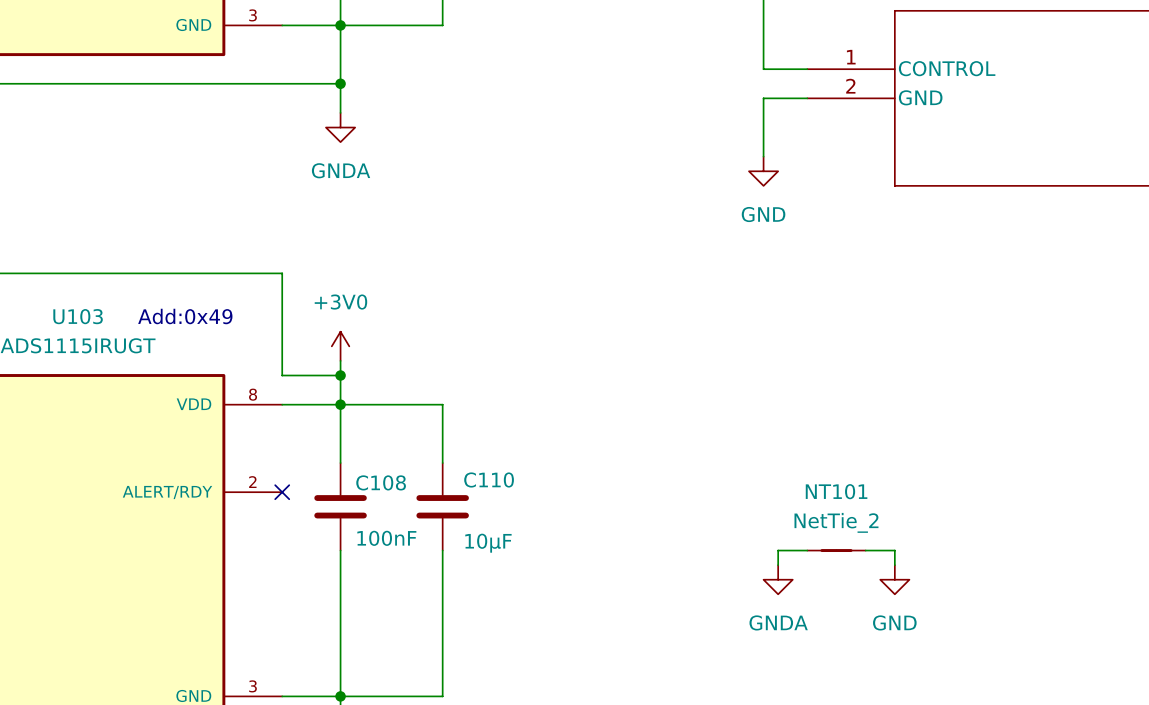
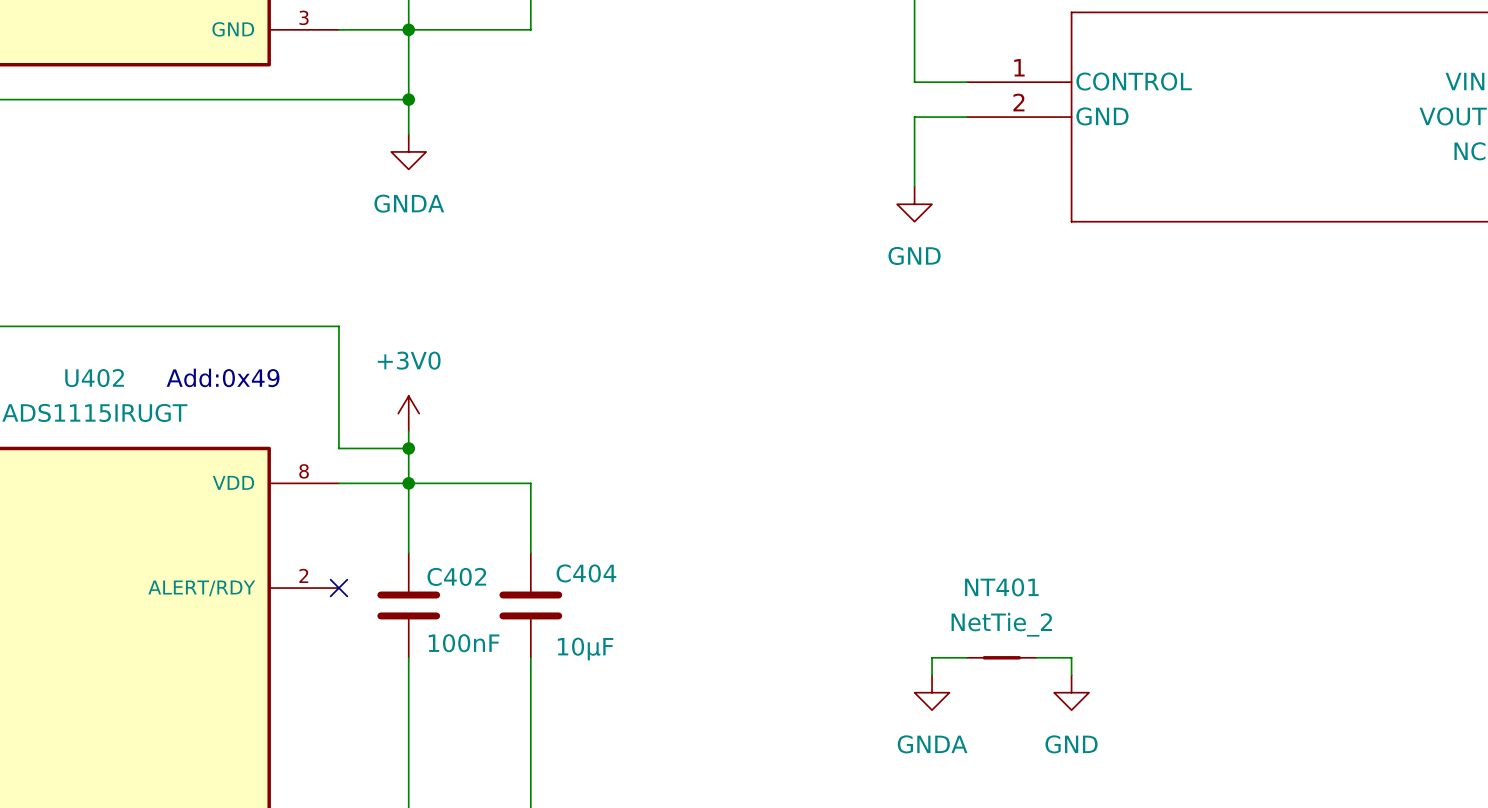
U103 name: U103 (78, 316) -> U402 (94, 378)
C110 name: C110 (489, 479) -> C404 (586, 573)
C108 name: C108 (381, 482) -> C402 (456, 576)
NT101 name: NT101 (836, 491) -> NT401 (1001, 587)

